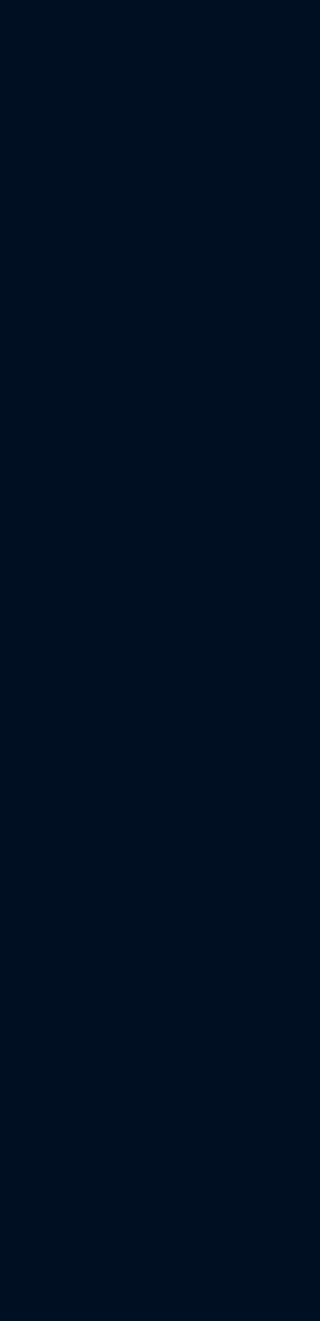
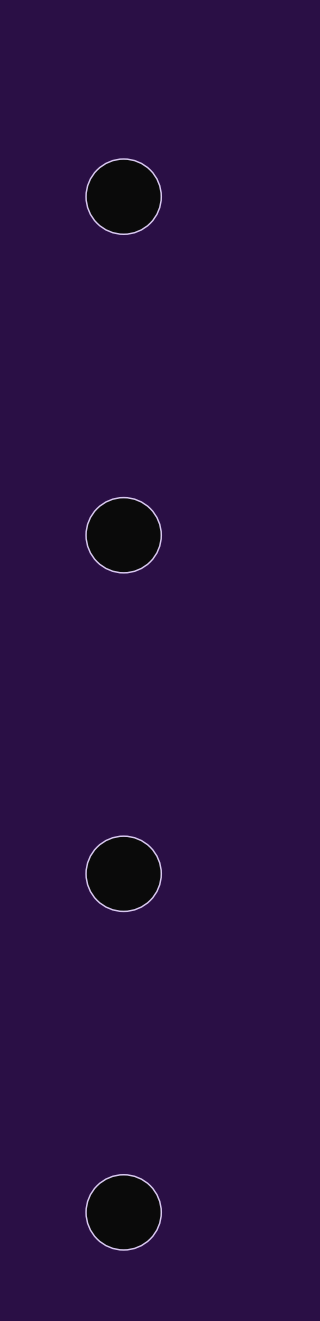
part: none -> (123, 196)
part: none -> (123, 535)
part: none -> (123, 873)
part: none -> (123, 1212)

